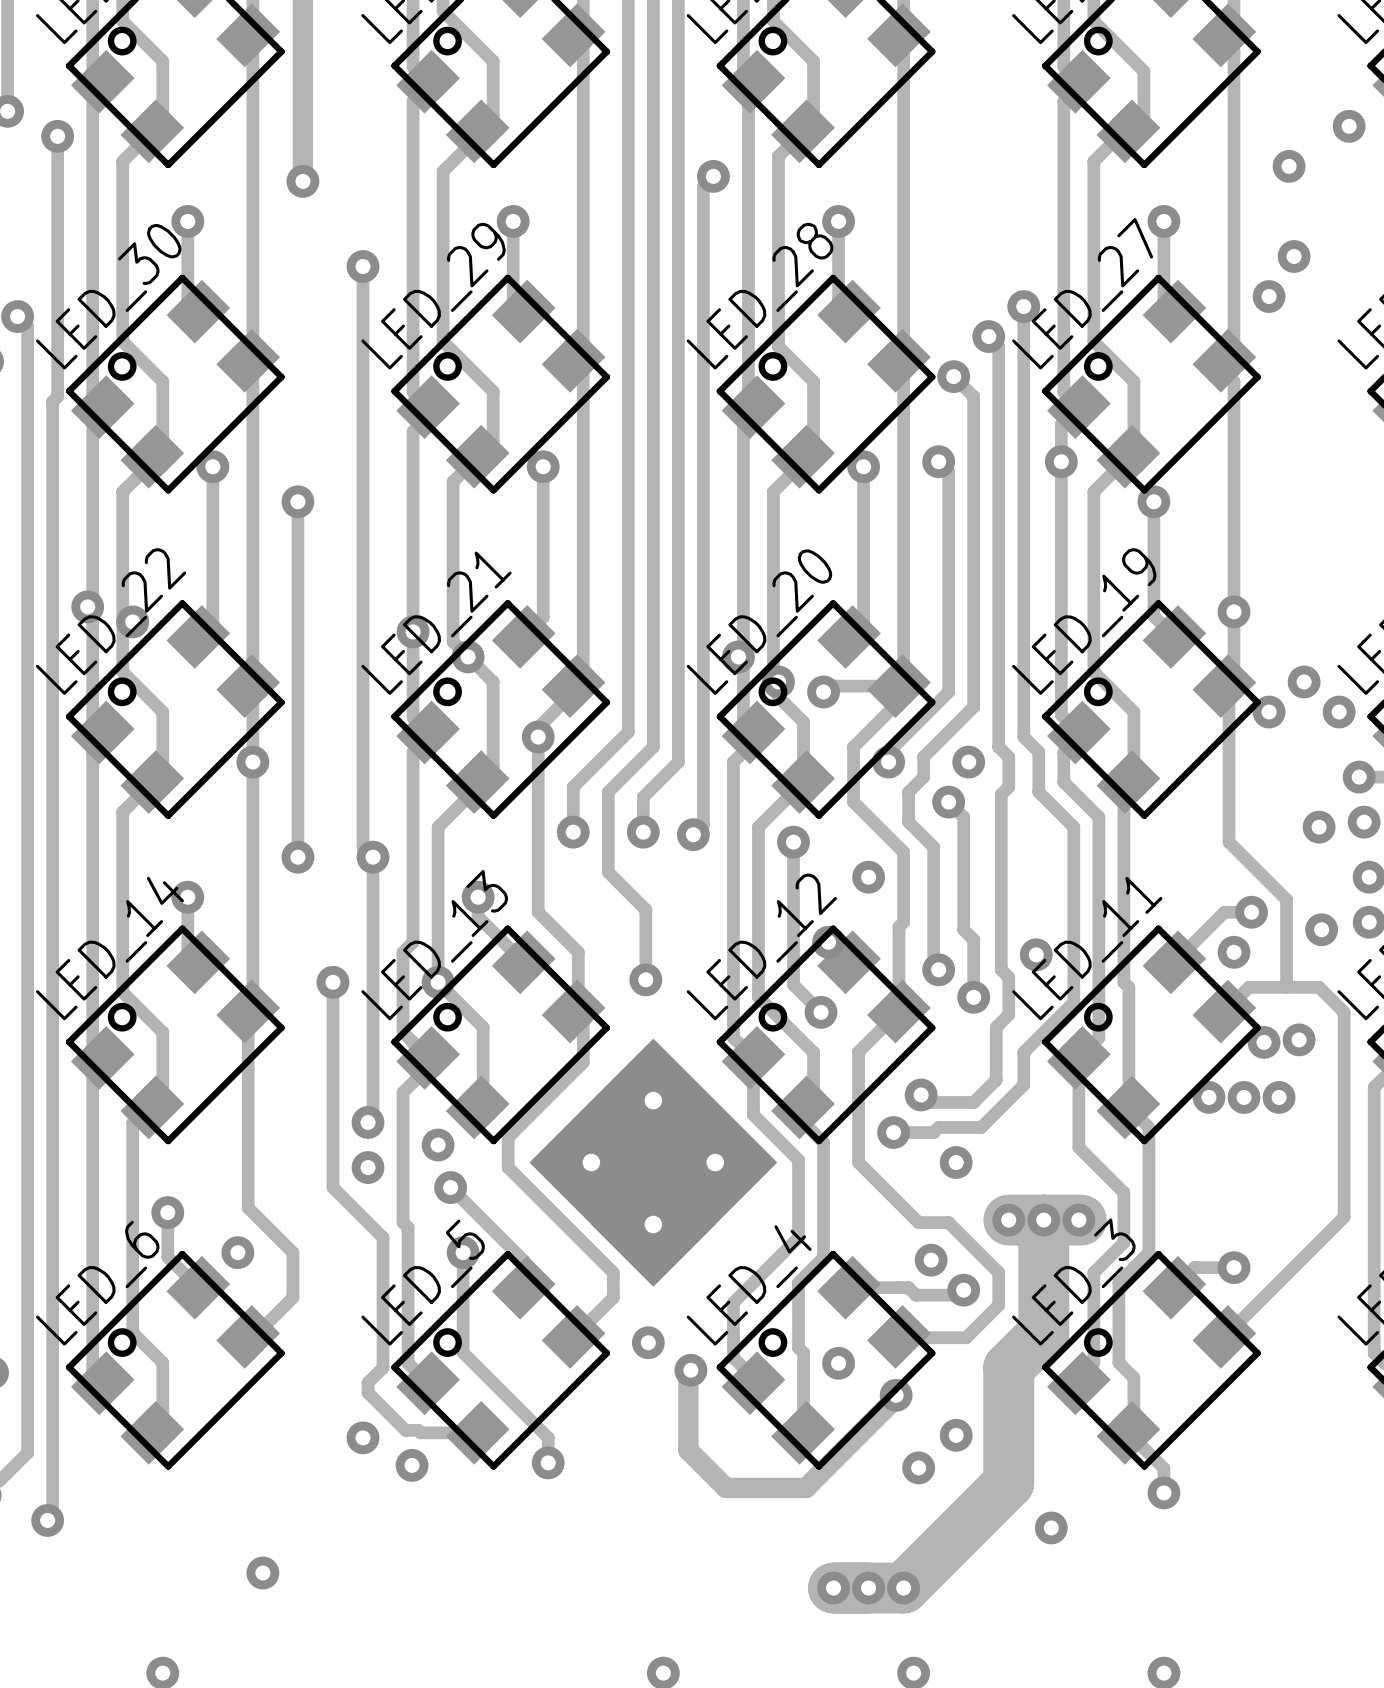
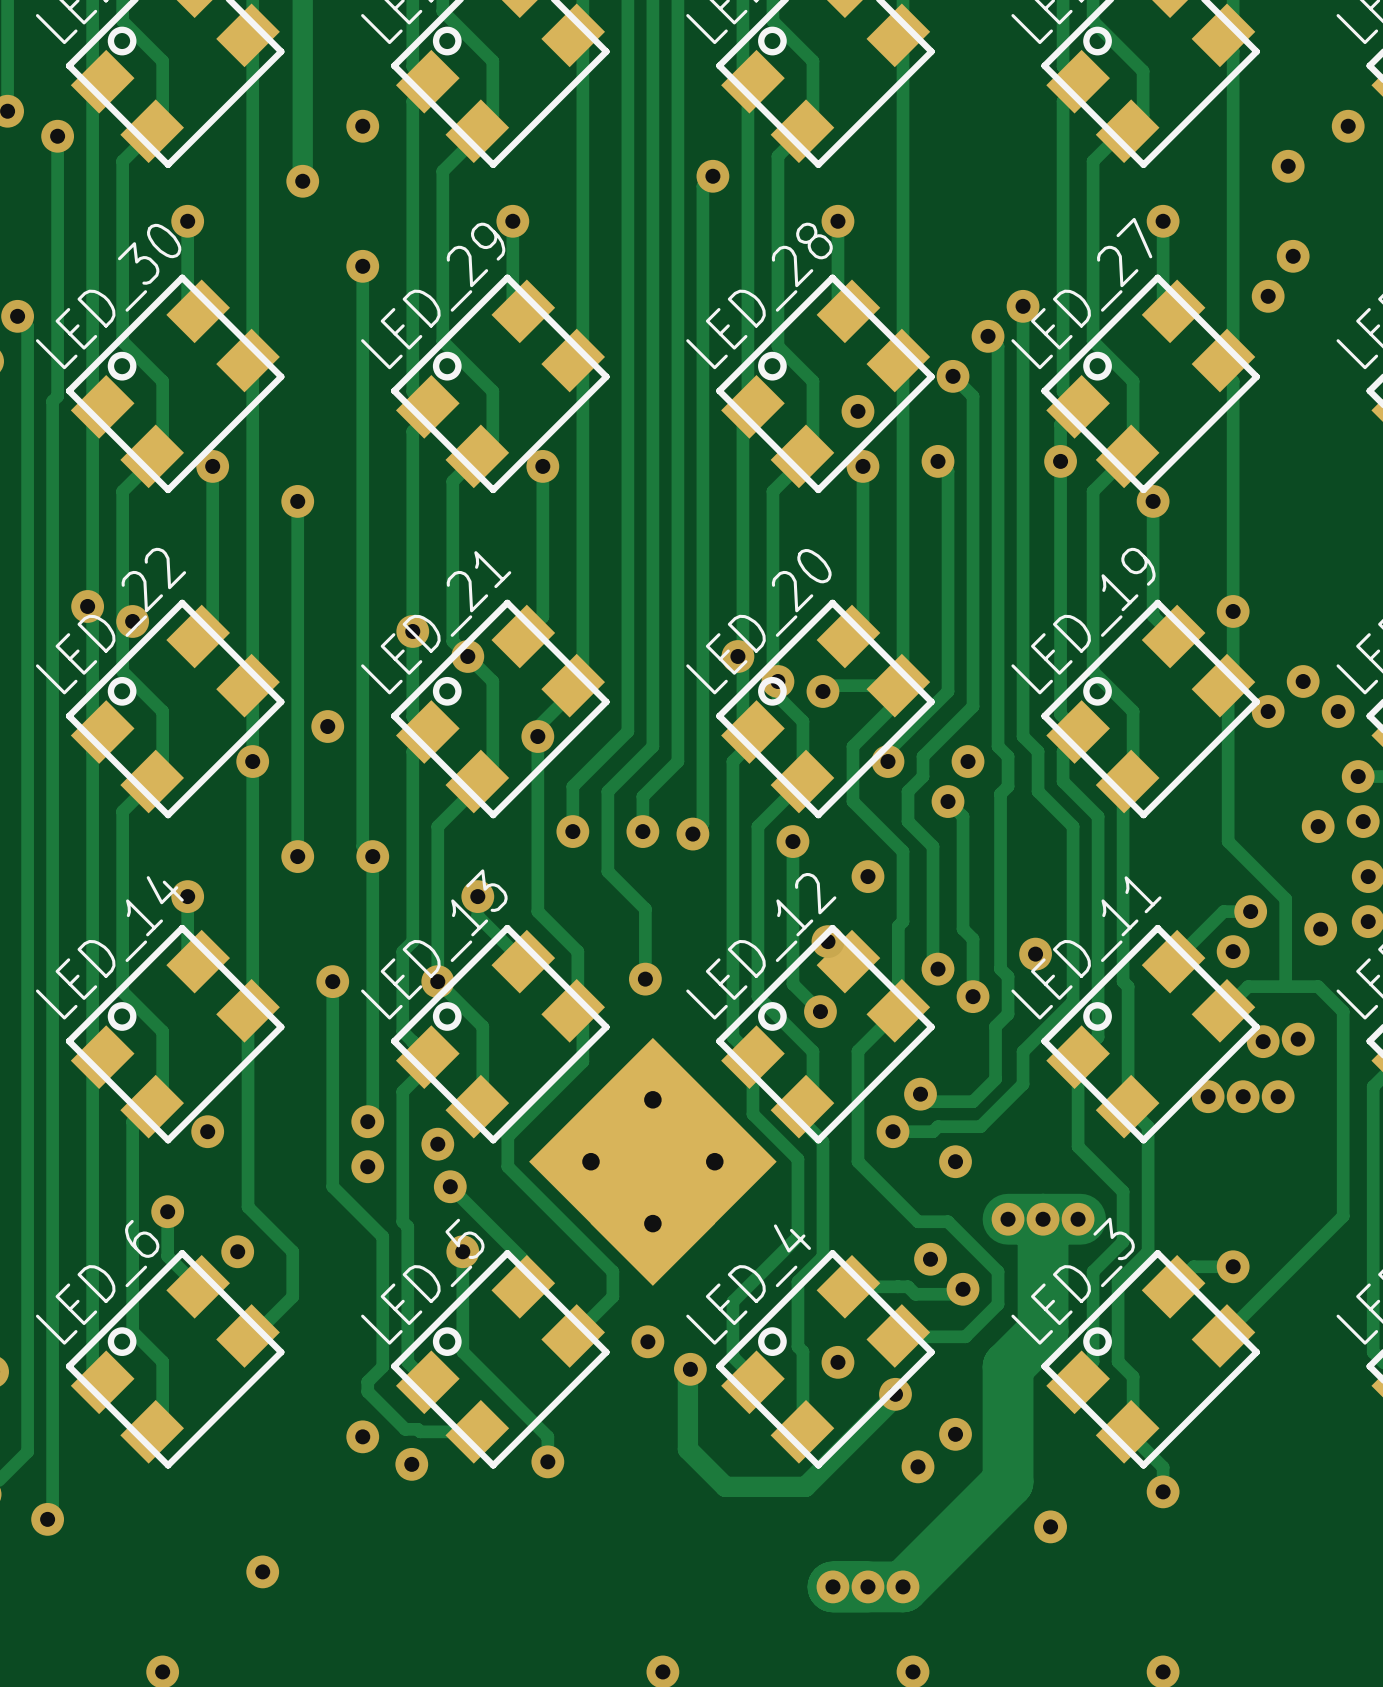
via: none -> (362, 126)
via: none -> (857, 411)
via: none -> (327, 726)
via: none -> (207, 1131)

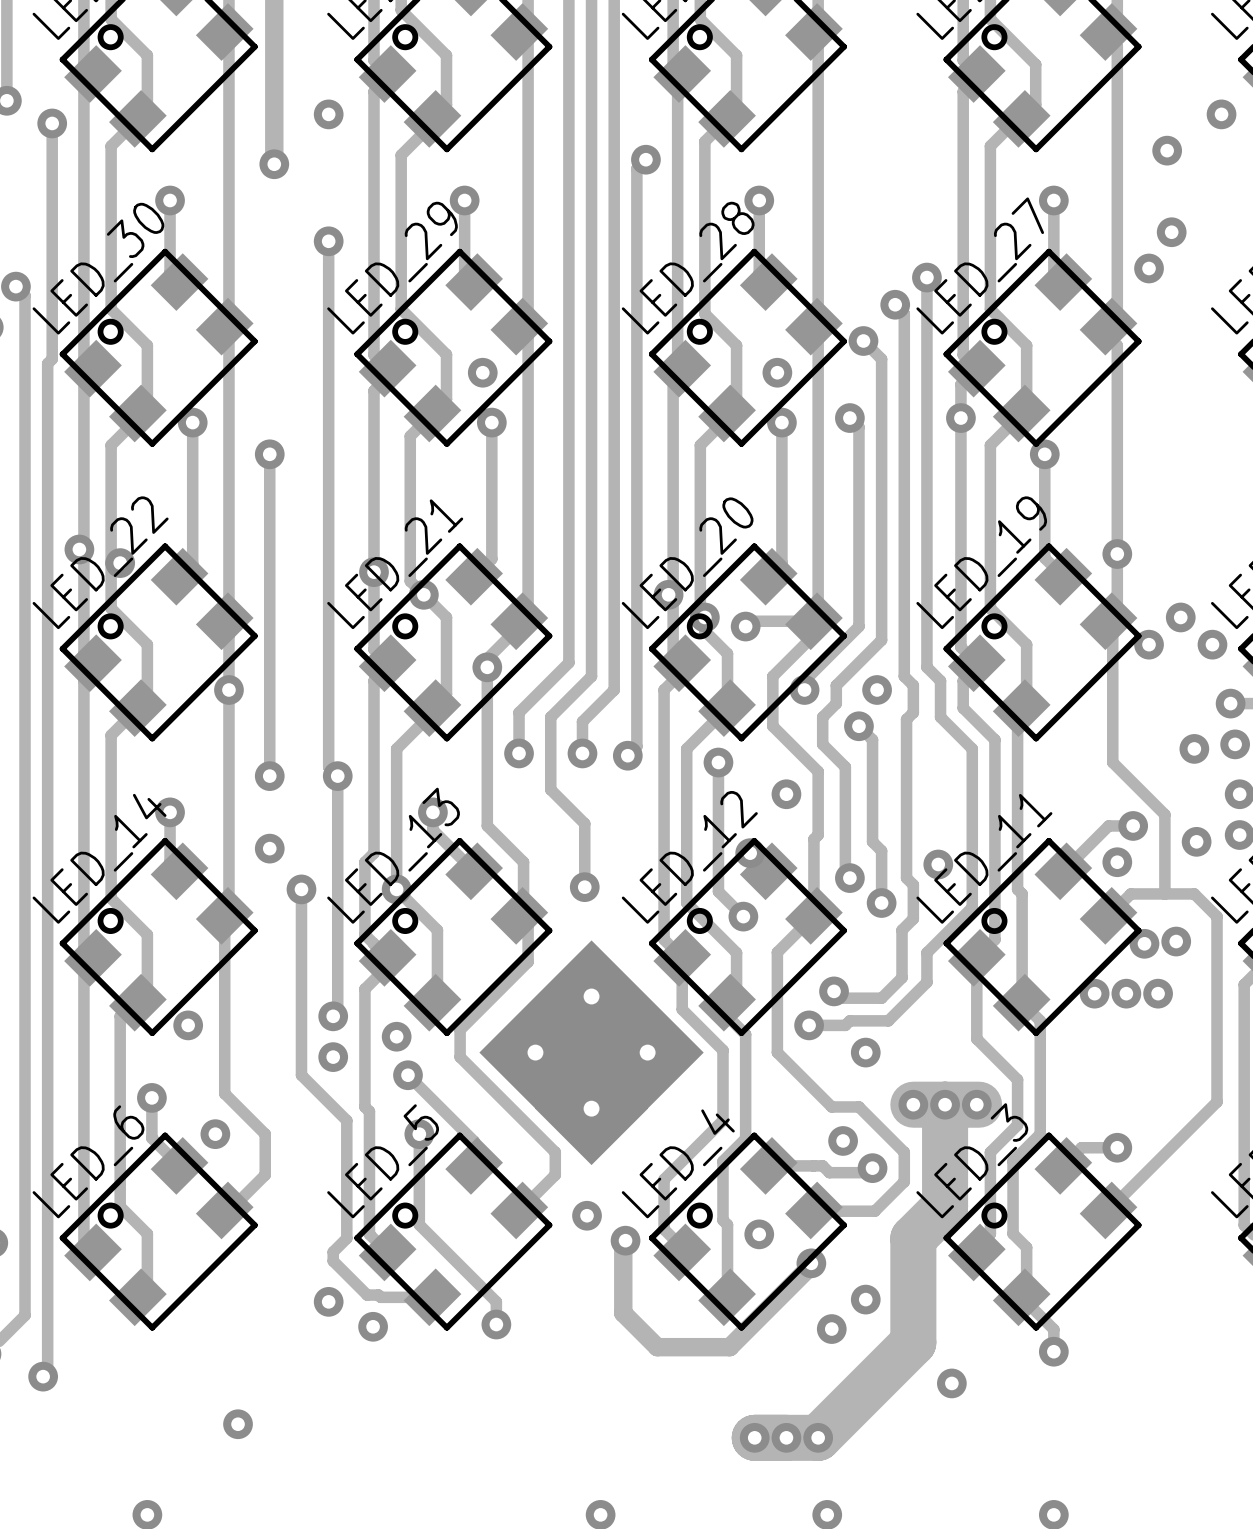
via: none -> (482, 372)
via: (327, 726) -> none
via: none -> (269, 848)

